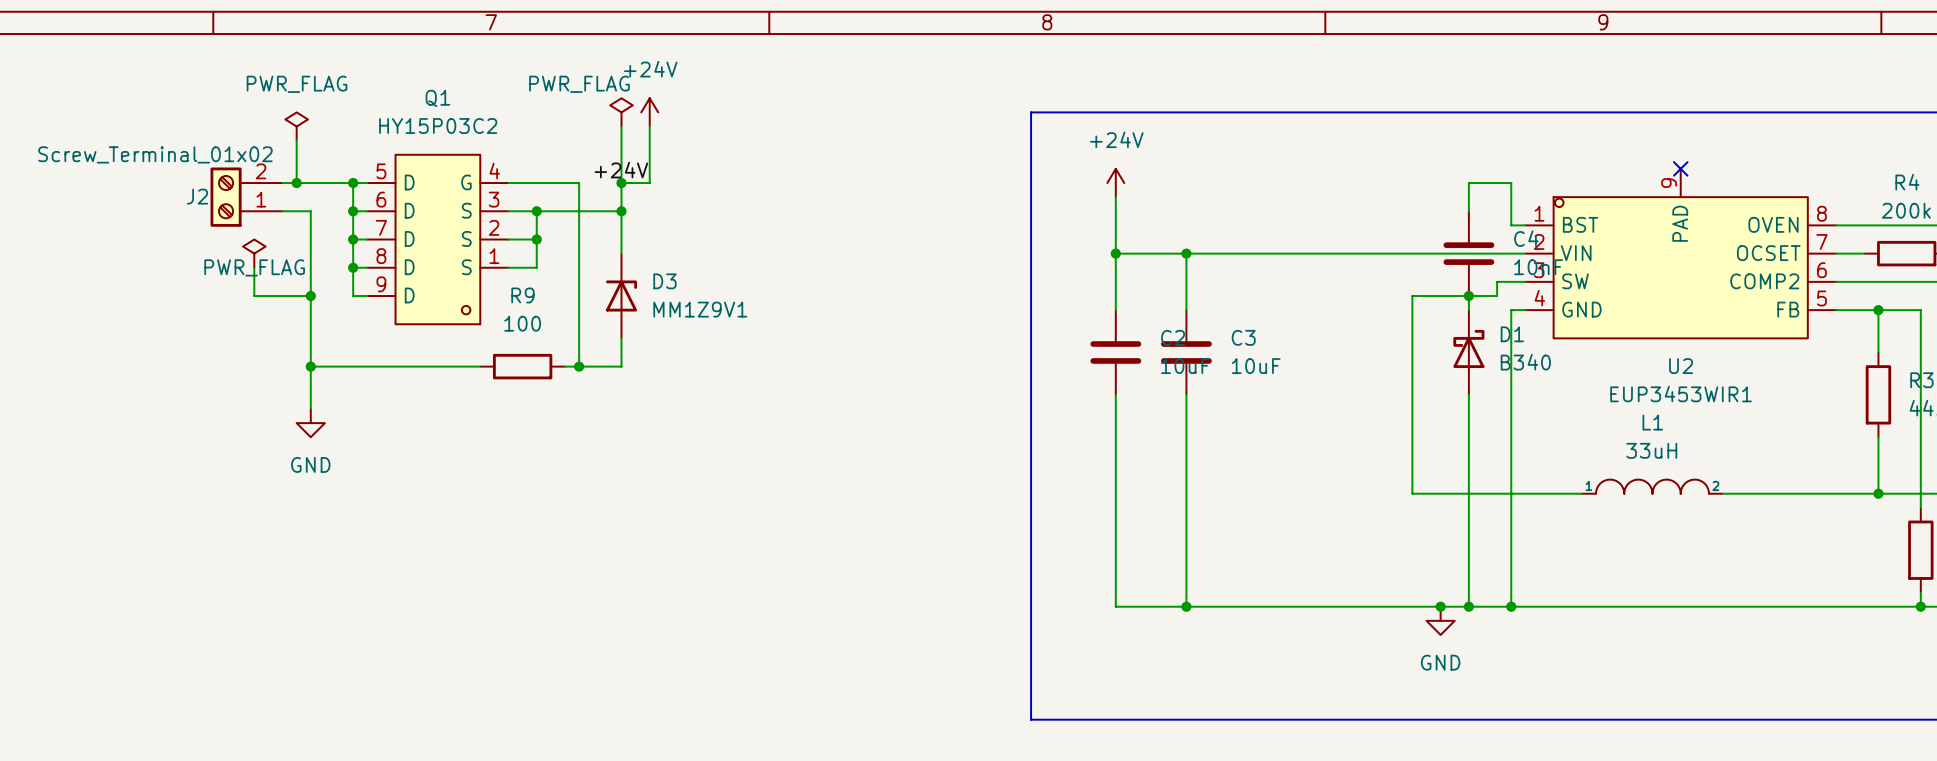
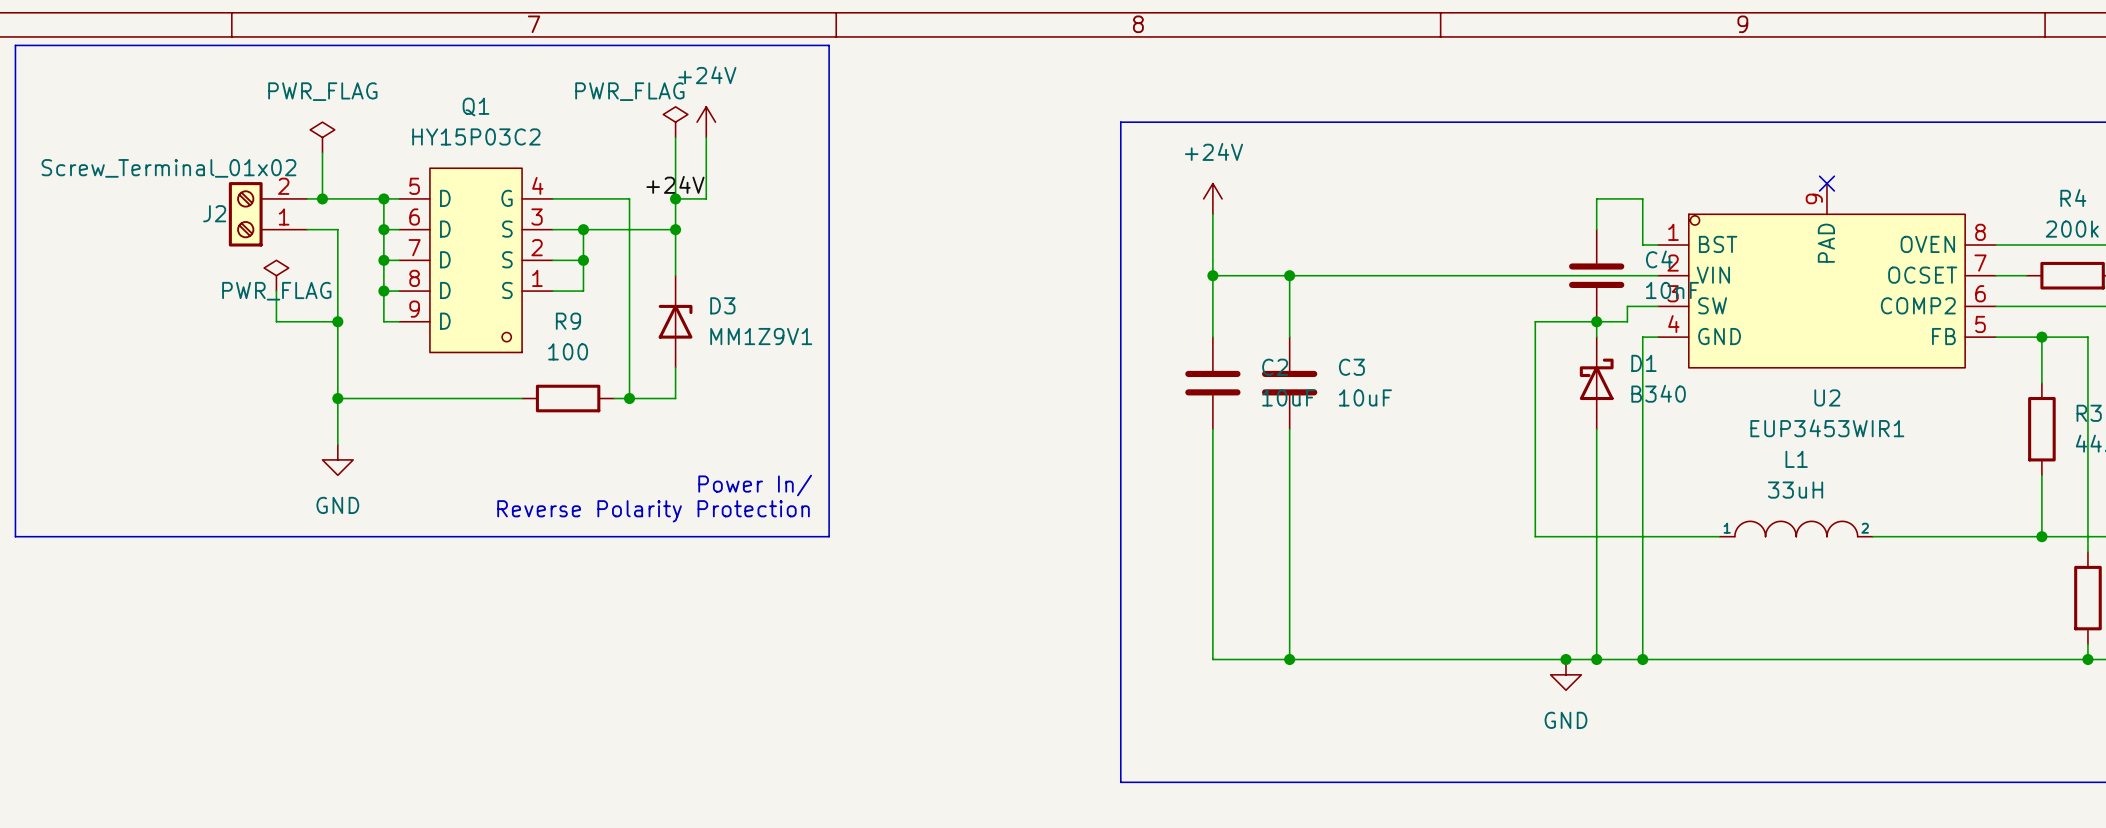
line: none -> (15, 45) (15, 536) (829, 536) (829, 45) (15, 45)
text: none -> Power In/ (755, 485)
text: none -> Reverse Polarity Protection (653, 511)

